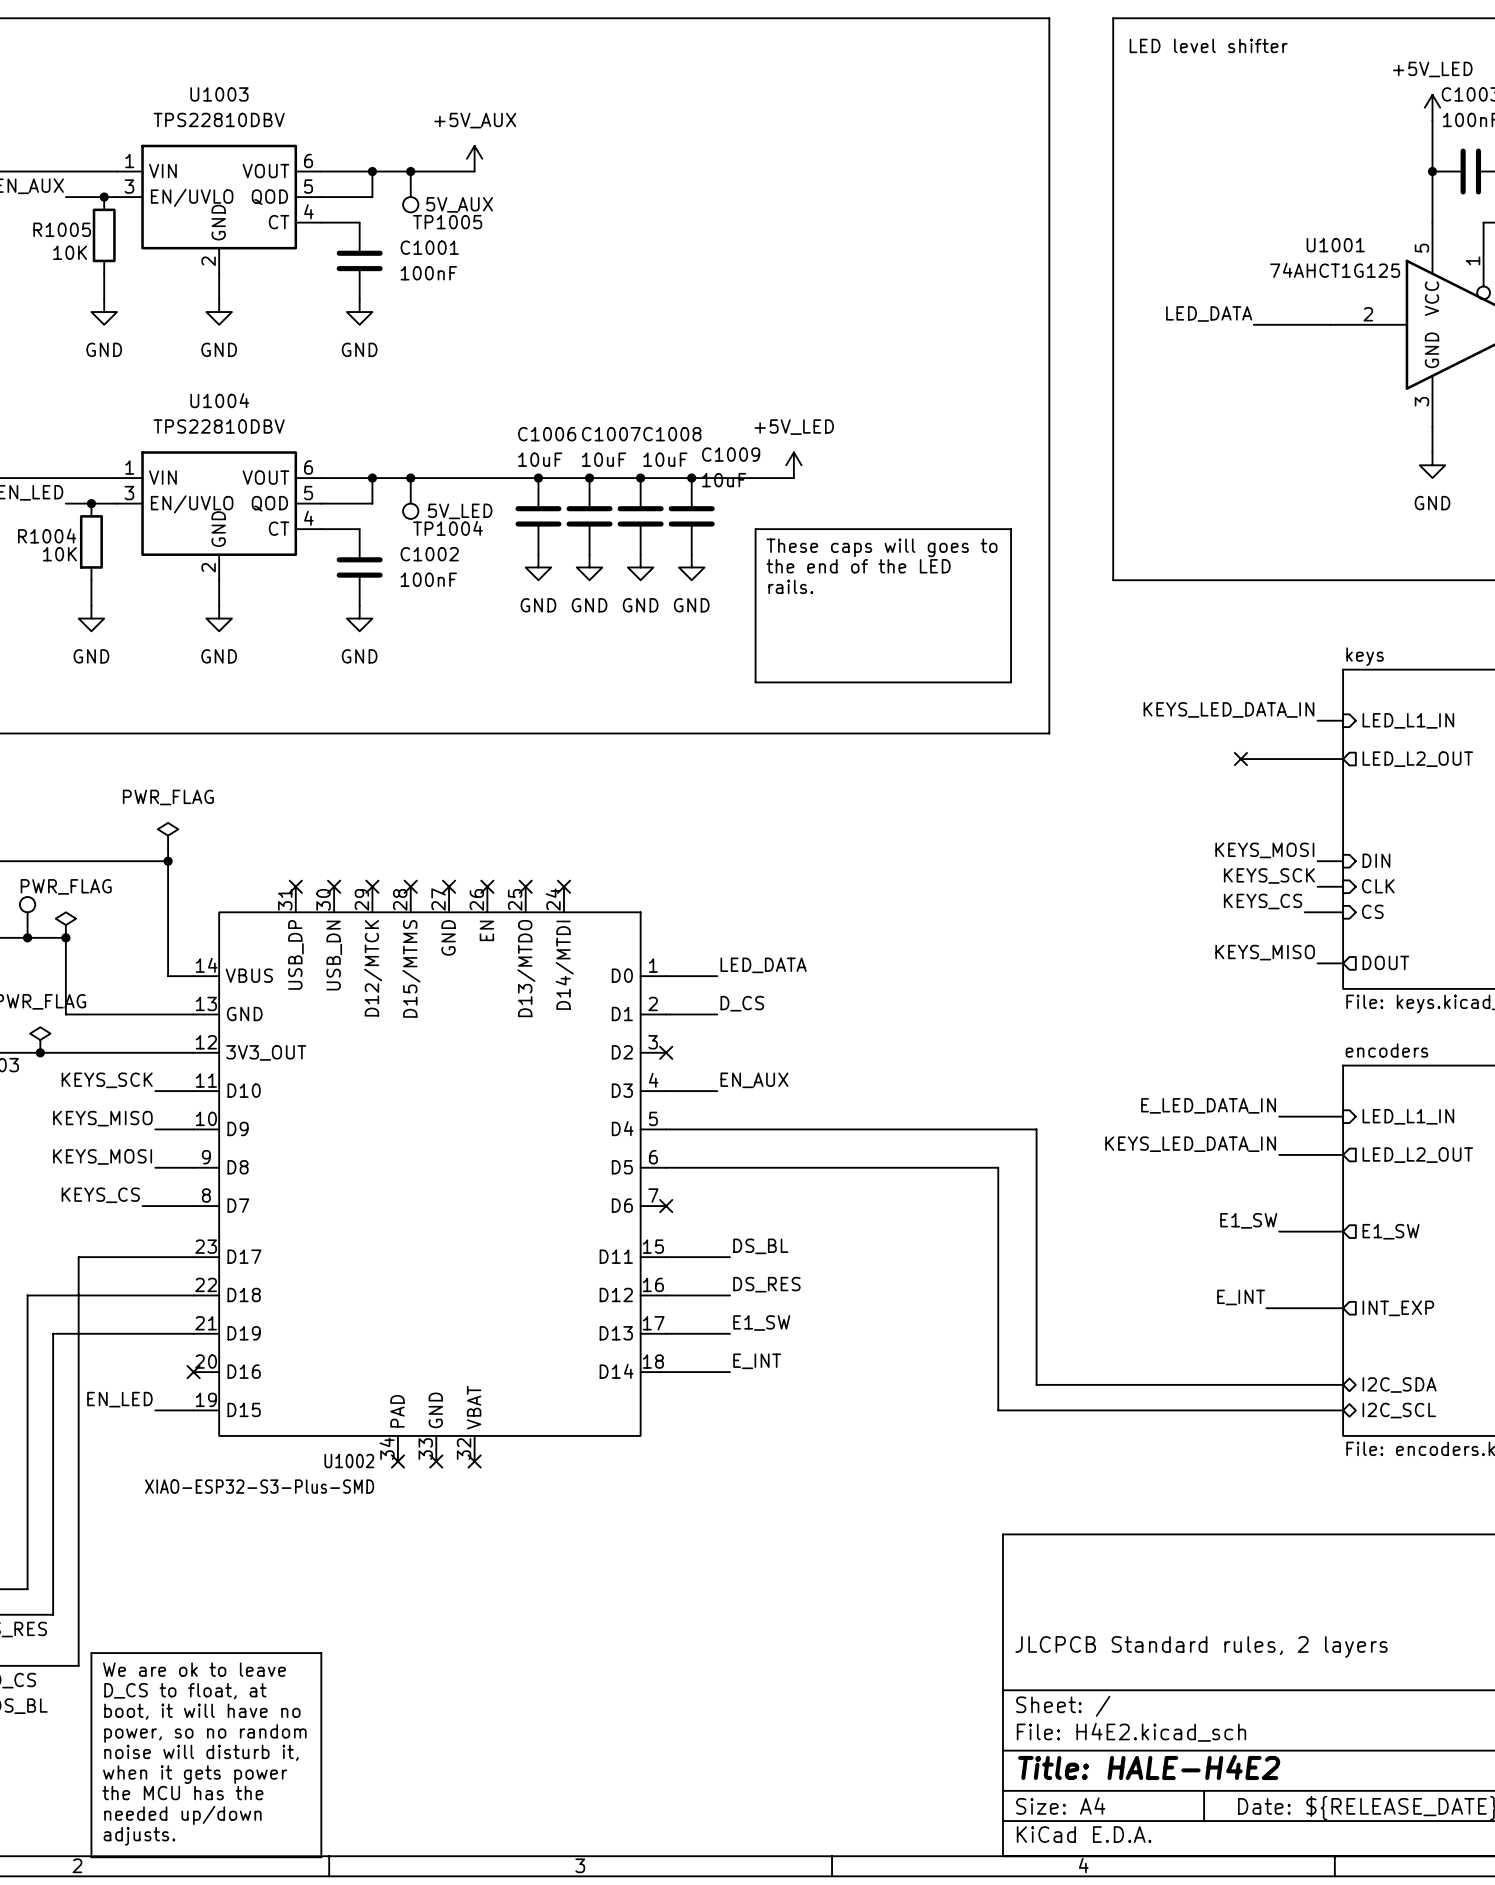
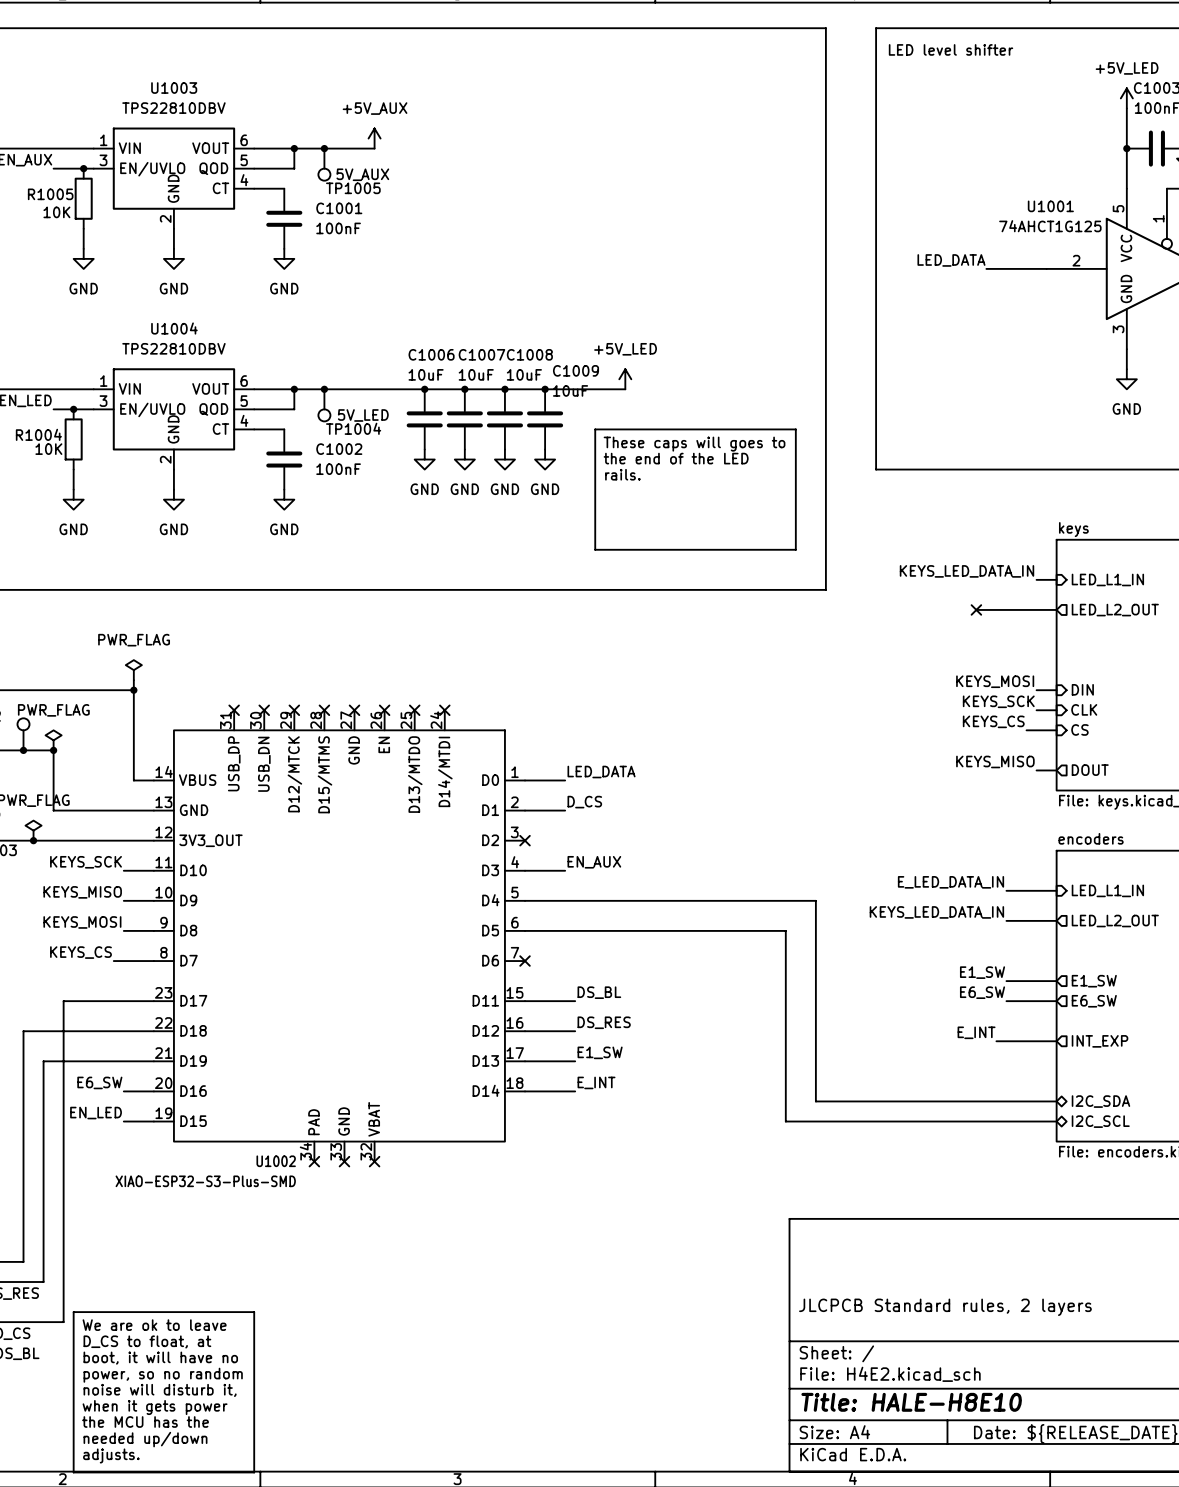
label: none -> E6_SW (982, 992)
wire: none -> (1006, 1001) (1056, 1001)
sheet pin: none -> E6_SW (1094, 1001)
label: none -> E6_SW (99, 1082)
wire: none -> (123, 1091) (153, 1091)
no-connect mark: (193, 1372) -> none
title block: Title: HALE-H4E2 (1149, 1767) -> Title: HALE-H8E10 (911, 1402)

